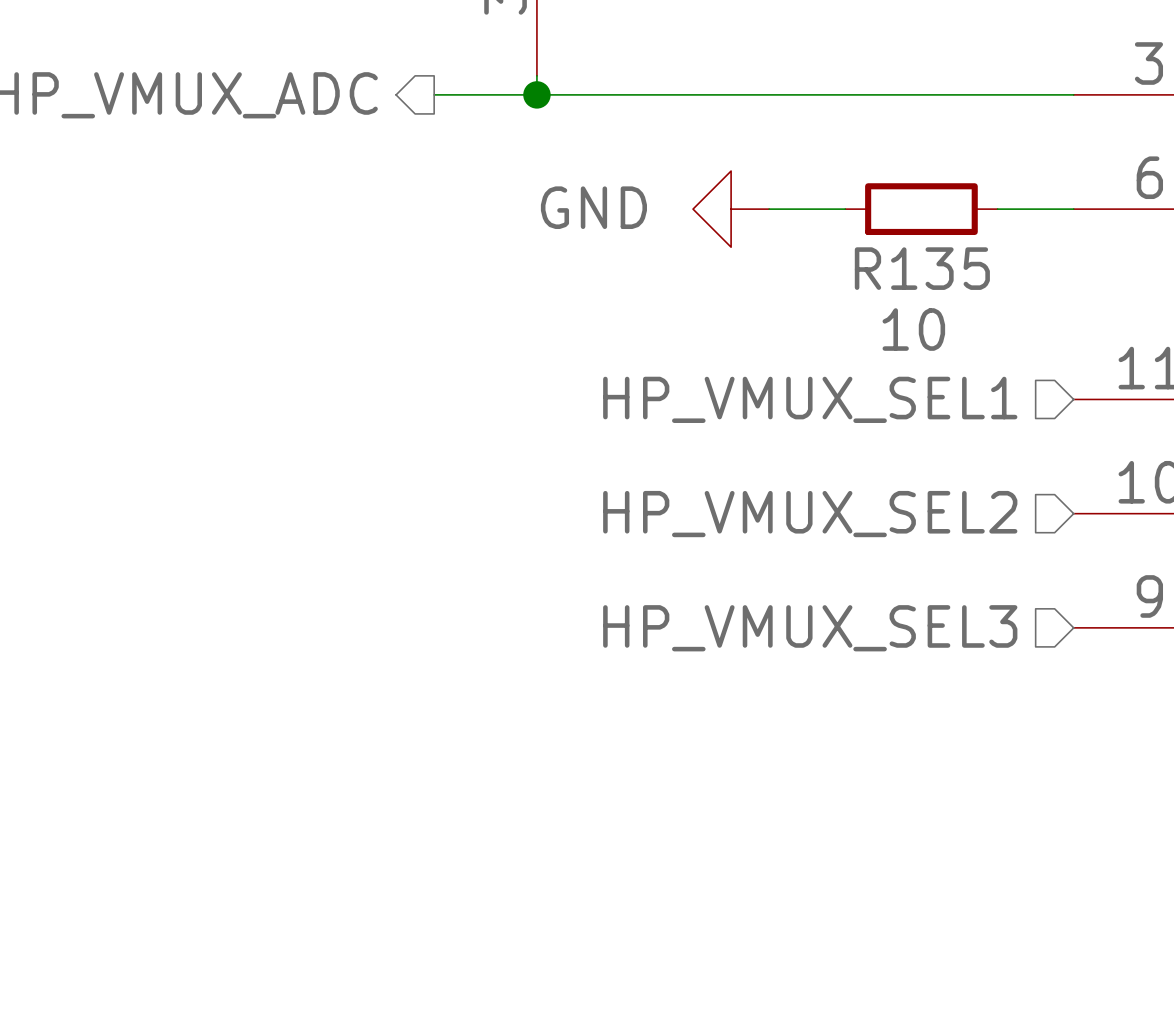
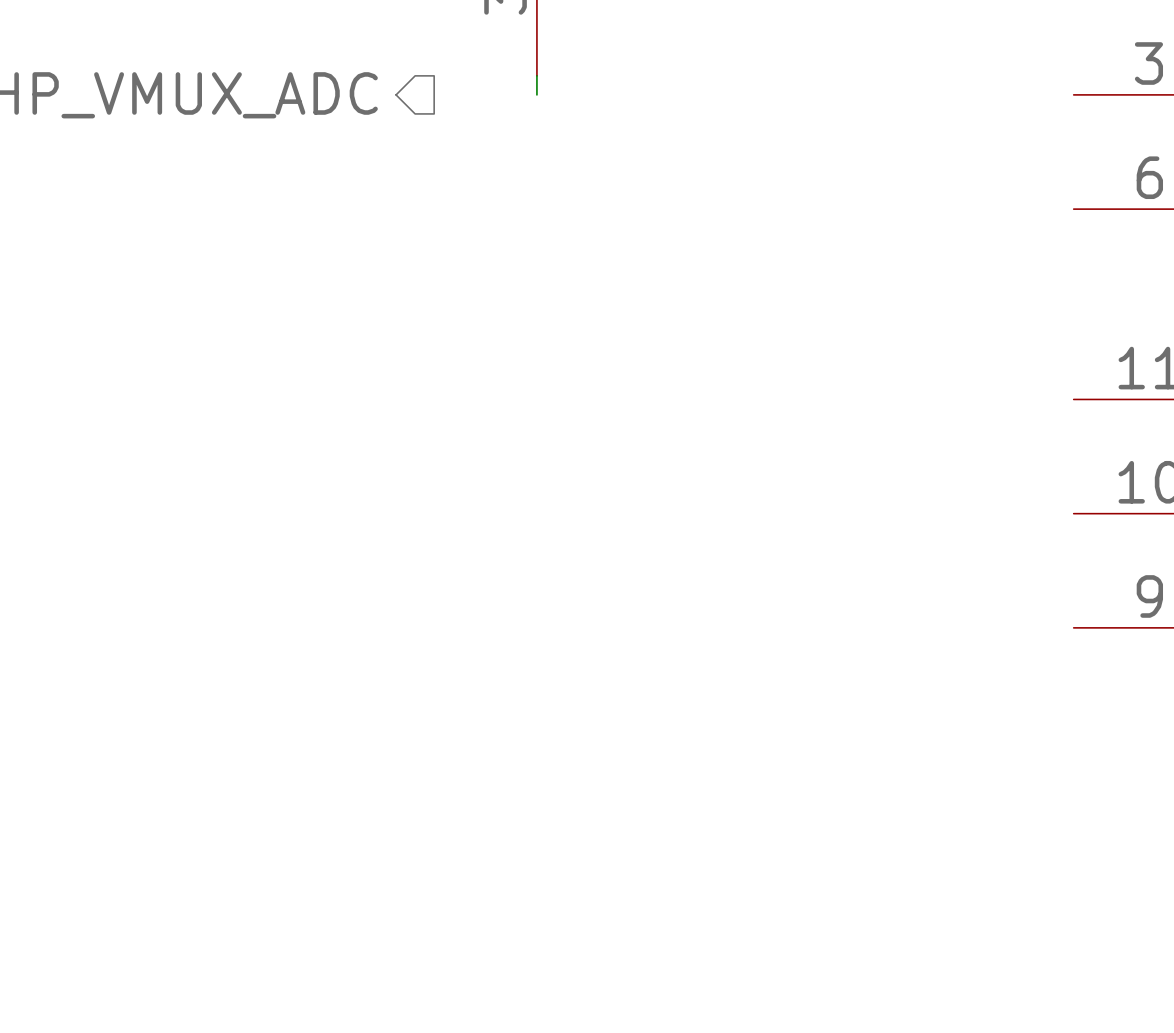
wire: (434, 94) (1073, 94) -> none
junction: (536, 94) -> none
power symbol: GND (731, 209) -> none
wire: (769, 209) (845, 209) -> none
R135: 10 (921, 209) -> none
wire: (997, 209) (1073, 209) -> none
hierarchical label: HP_VMUX_SEL1 (810, 399) -> none
hierarchical label: HP_VMUX_SEL2 (810, 514) -> none
hierarchical label: HP_VMUX_SEL3 (810, 628) -> none

